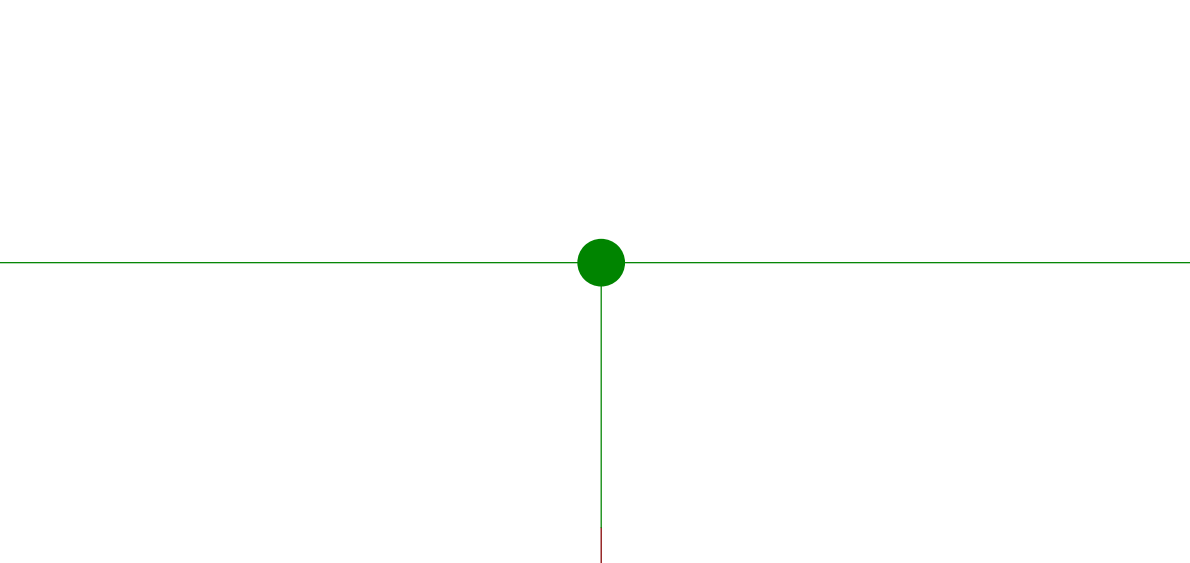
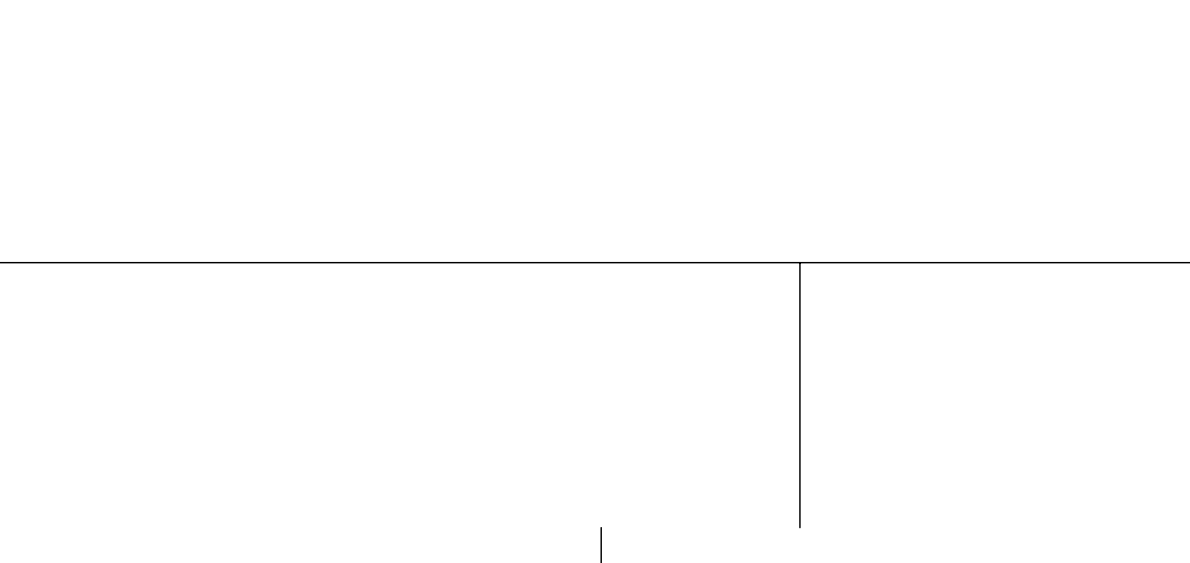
wire: (601, 262) (601, 527) -> (799, 262) (799, 527)
junction: (601, 262) -> none

